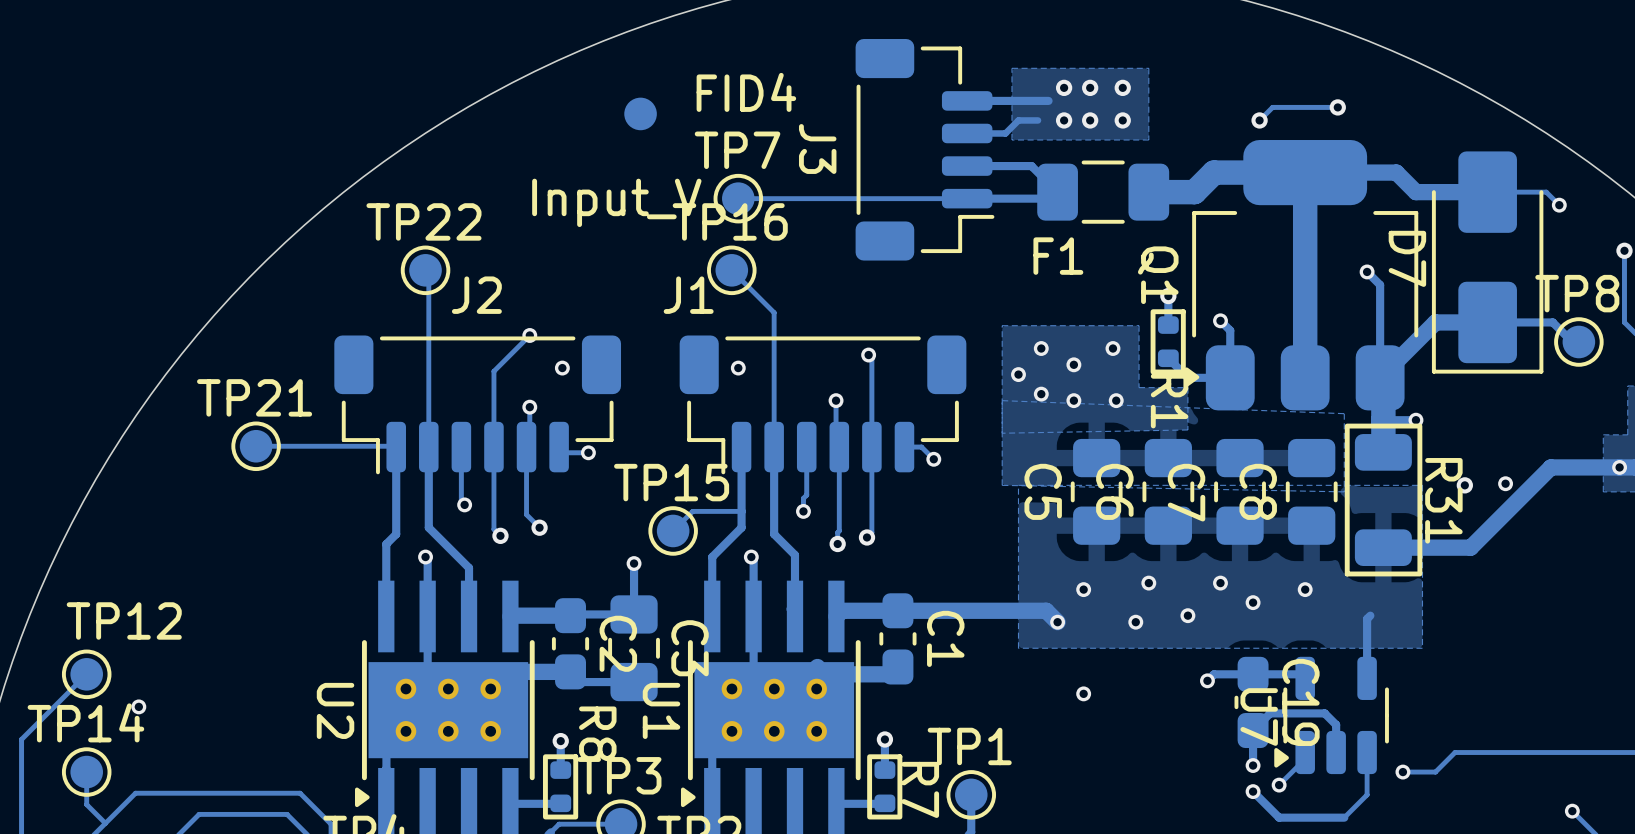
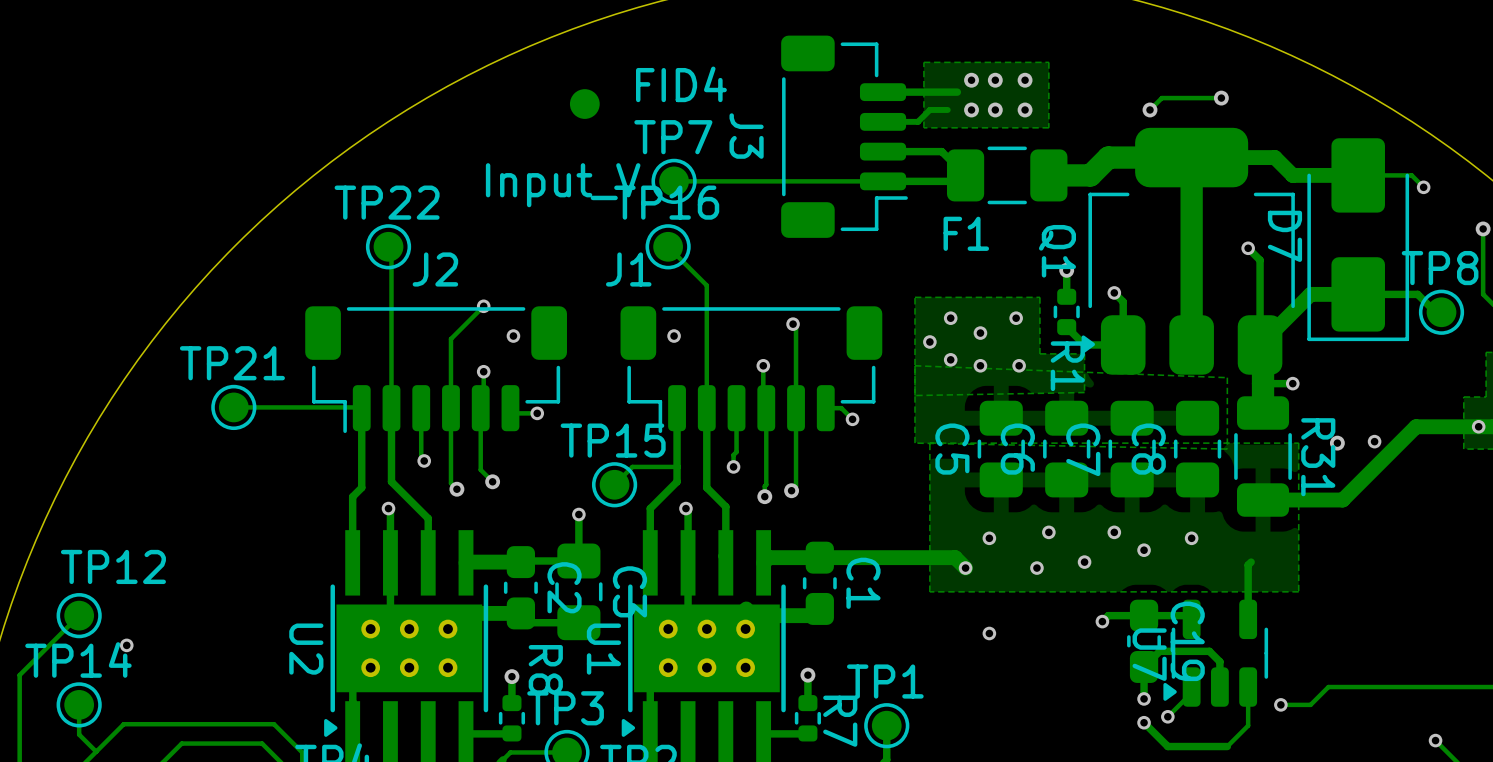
R1 footprint: [1150, 309, 1186, 375] -> [1053, 288, 1080, 336]
R31 footprint: [1344, 423, 1423, 577] -> [1234, 396, 1292, 517]
R8 footprint: [542, 754, 579, 820] -> [498, 695, 526, 742]
R7 footprint: [867, 754, 903, 820] -> [794, 695, 822, 742]

